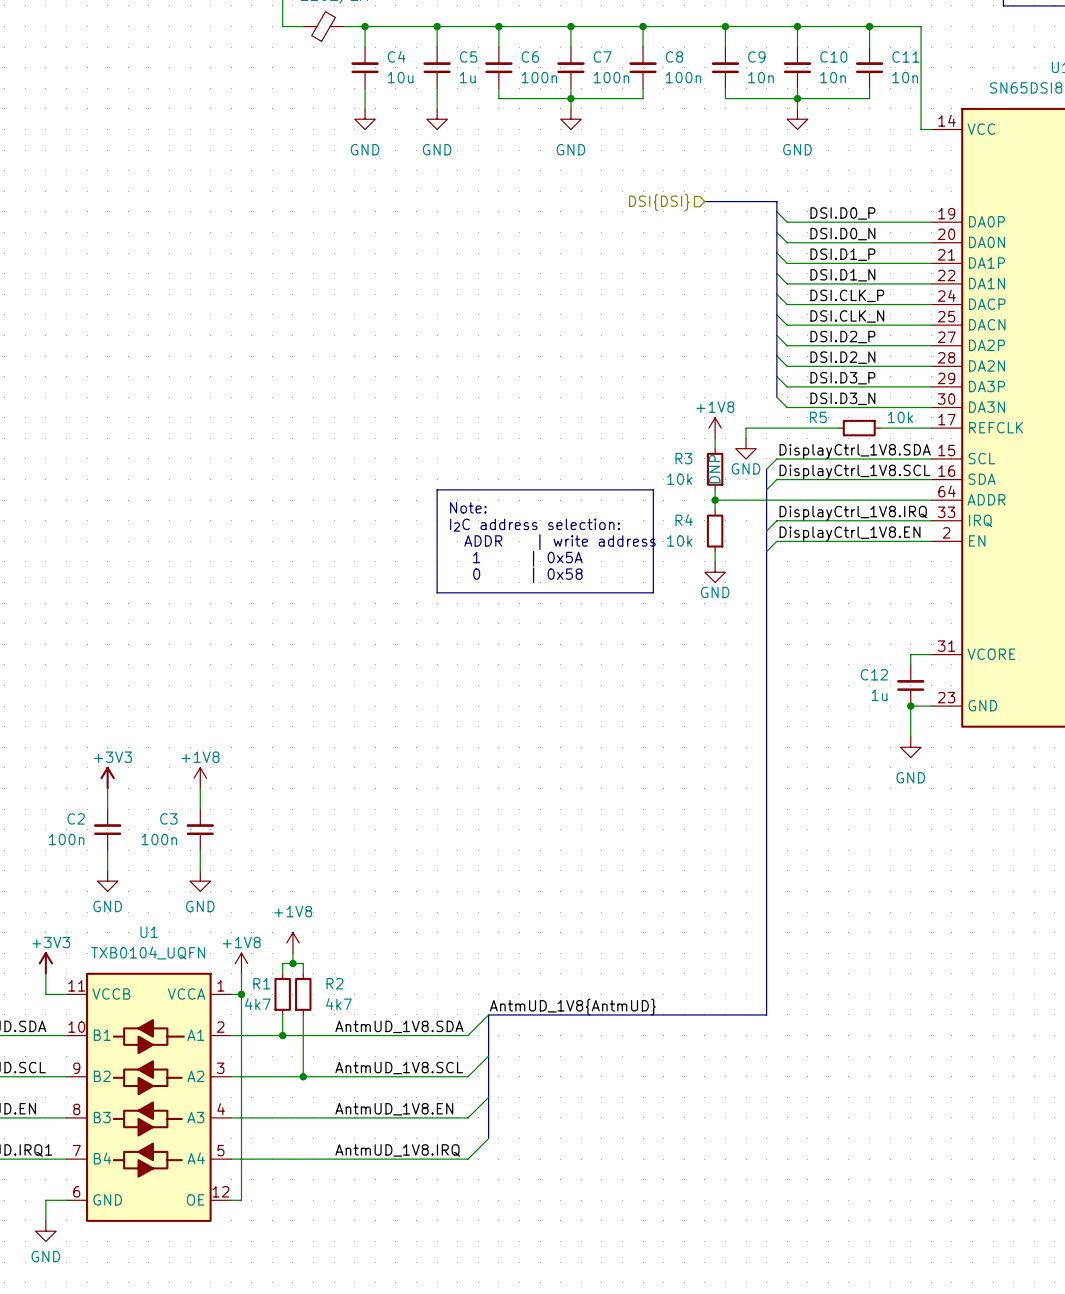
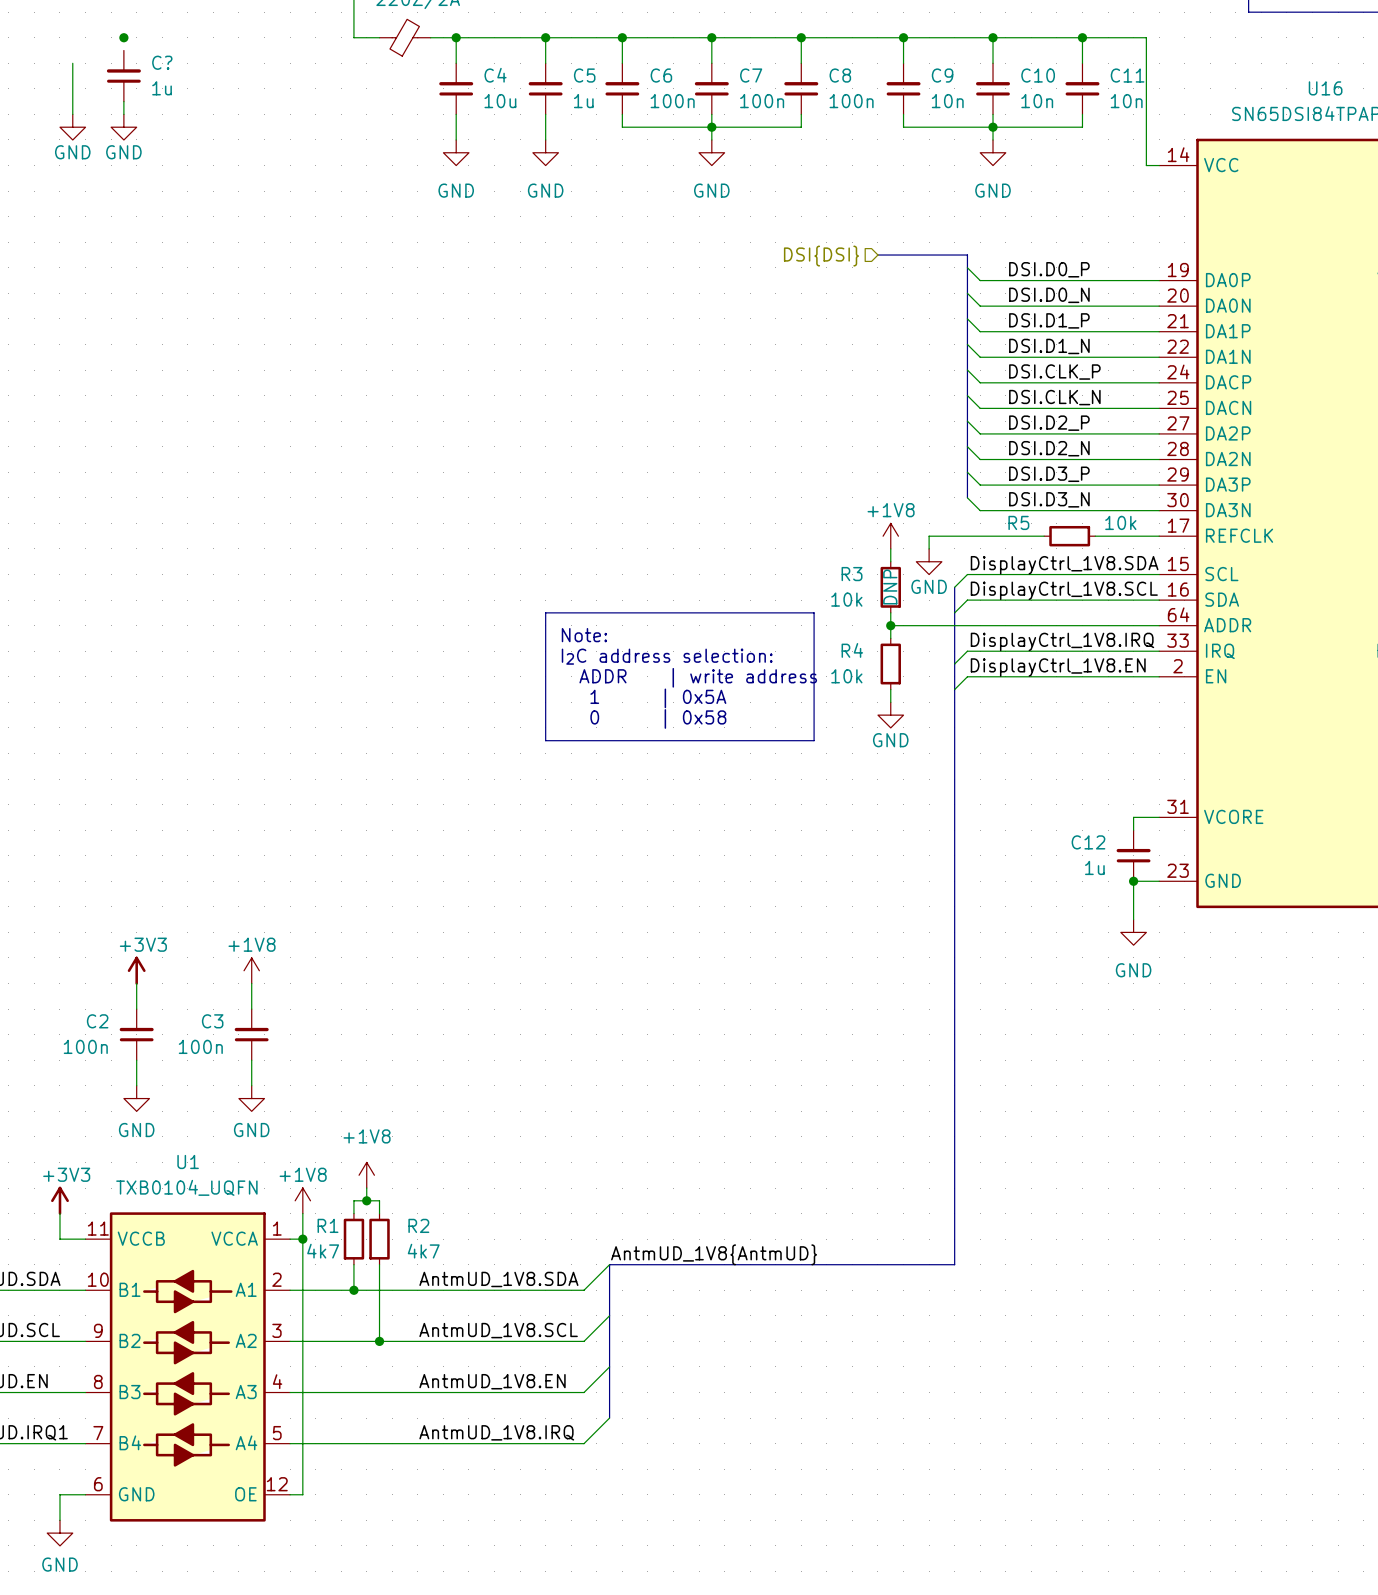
junction: none -> (123, 37)
wire: none -> (72, 63) (72, 114)
C?: none -> (123, 76)
wire: none -> (123, 101) (123, 114)
power symbol: none -> GND (72, 127)
power symbol: none -> GND (123, 127)

